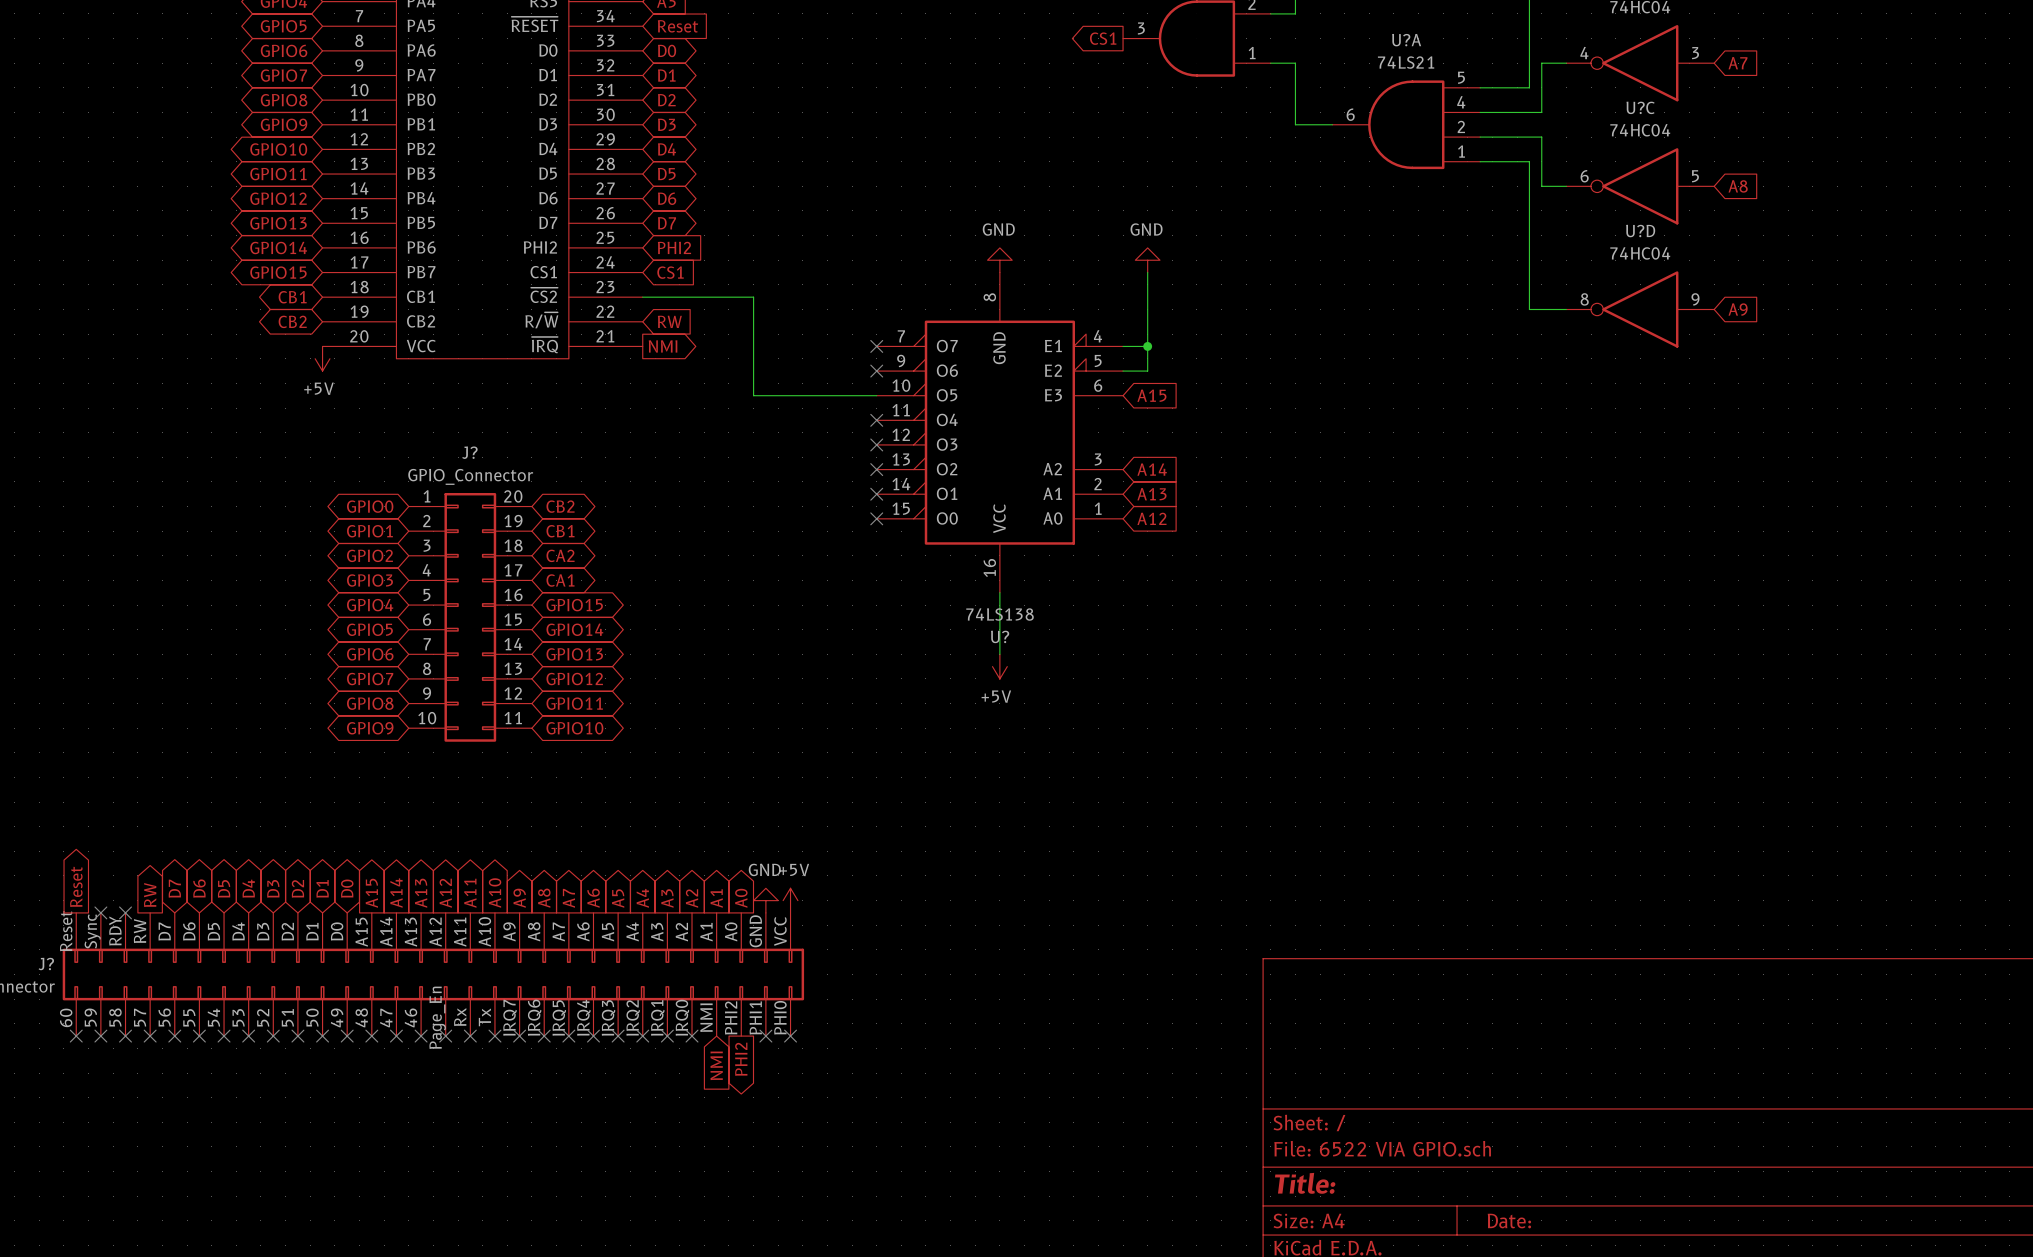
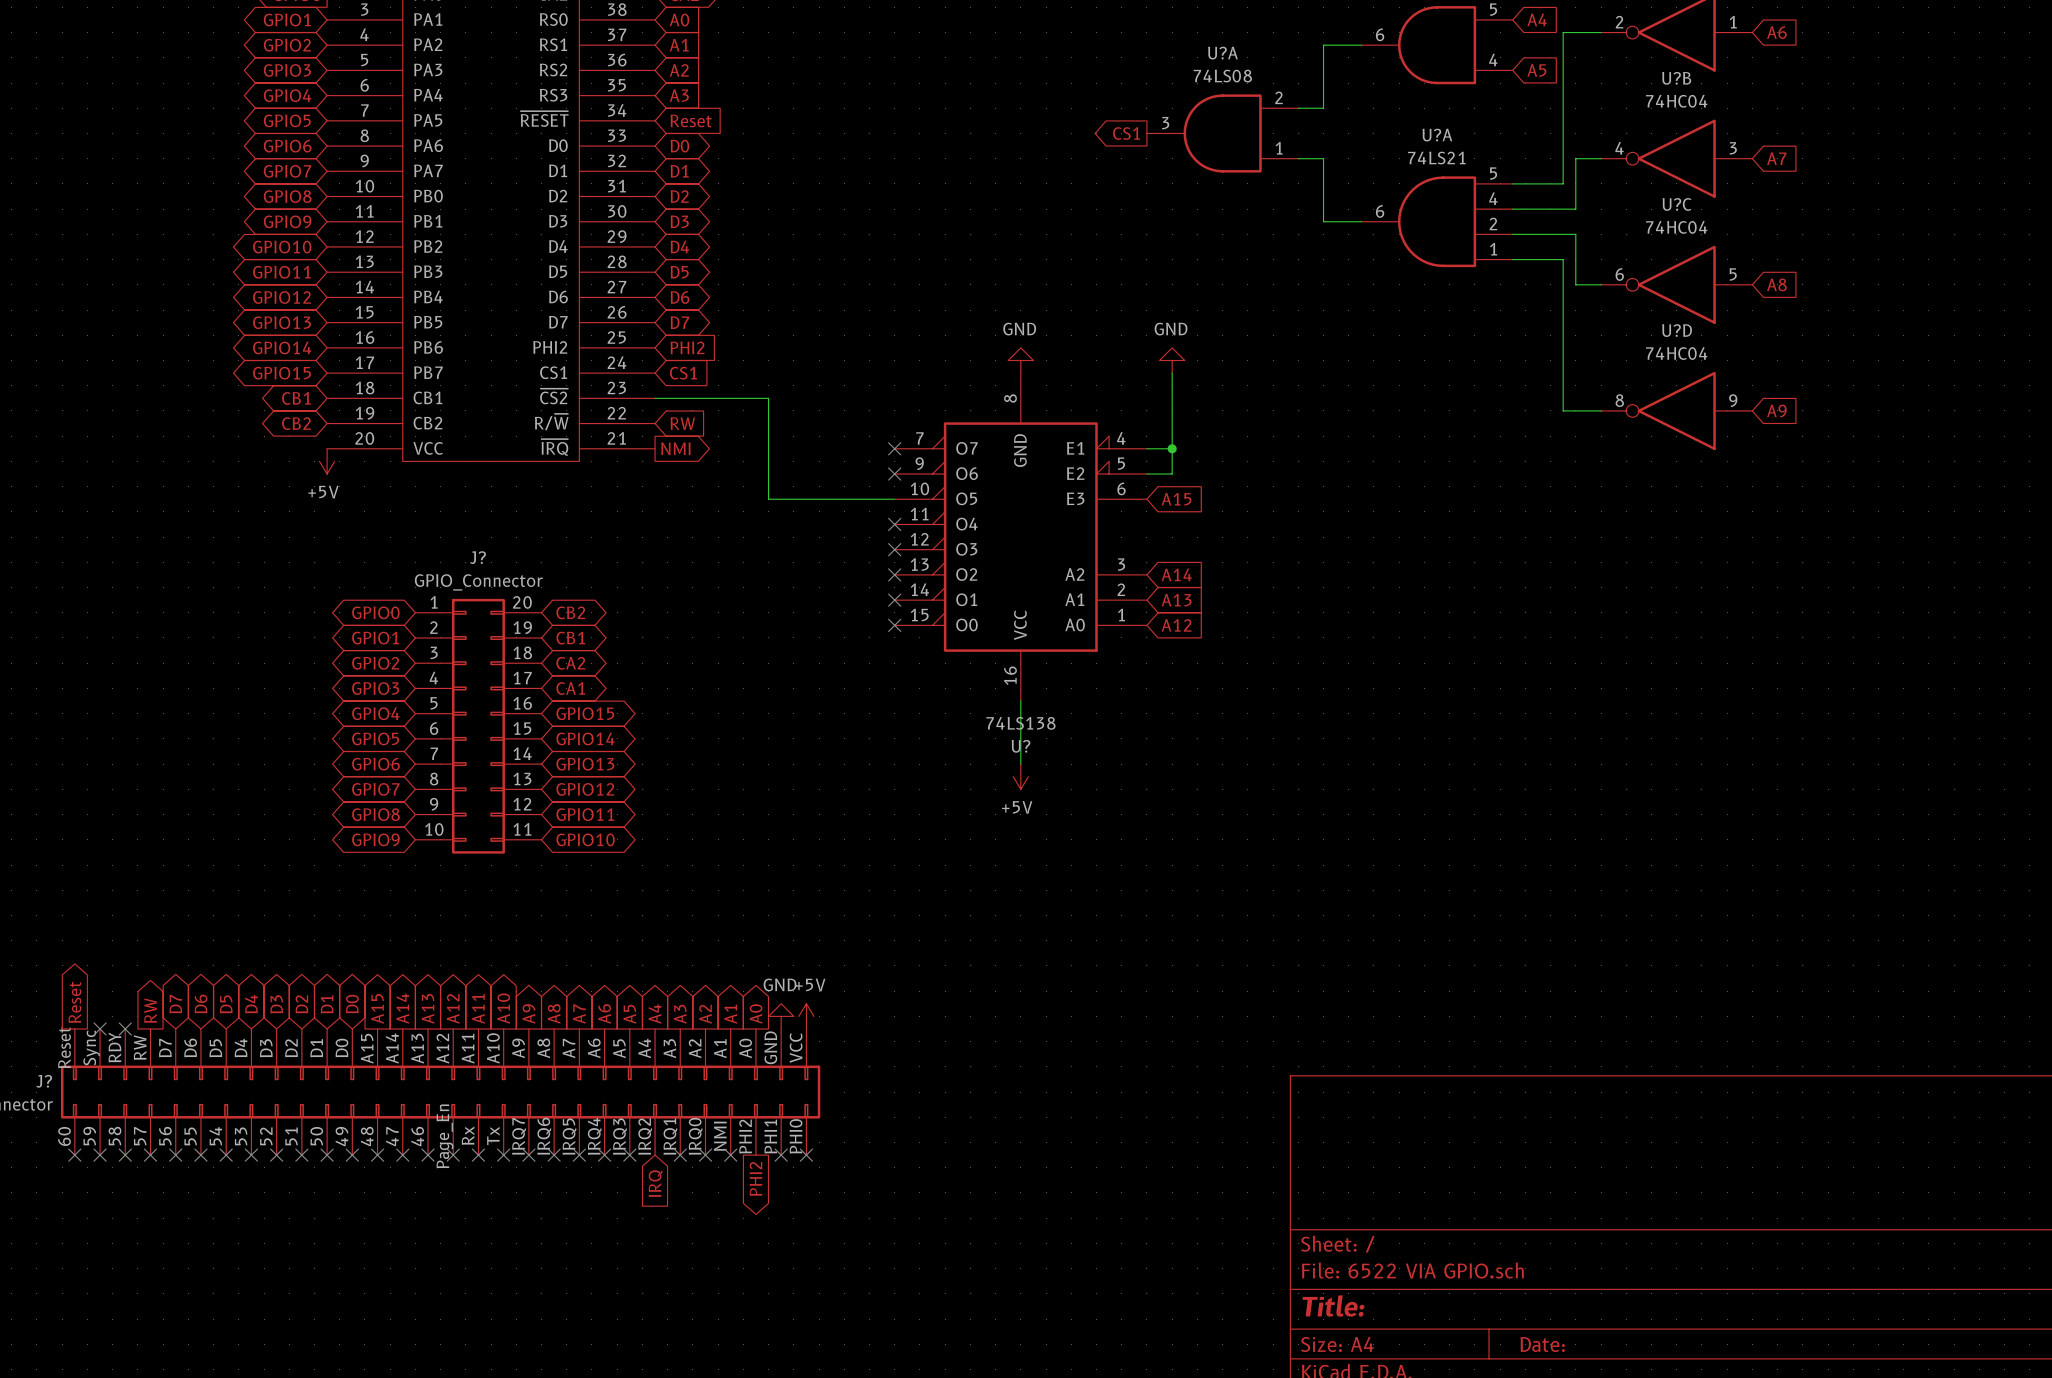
no-connect mark: (642, 1036) -> none
no-connect mark: none -> (730, 1155)
global label: none -> IRQ (655, 1183)
global label: NMI (716, 1065) -> none

